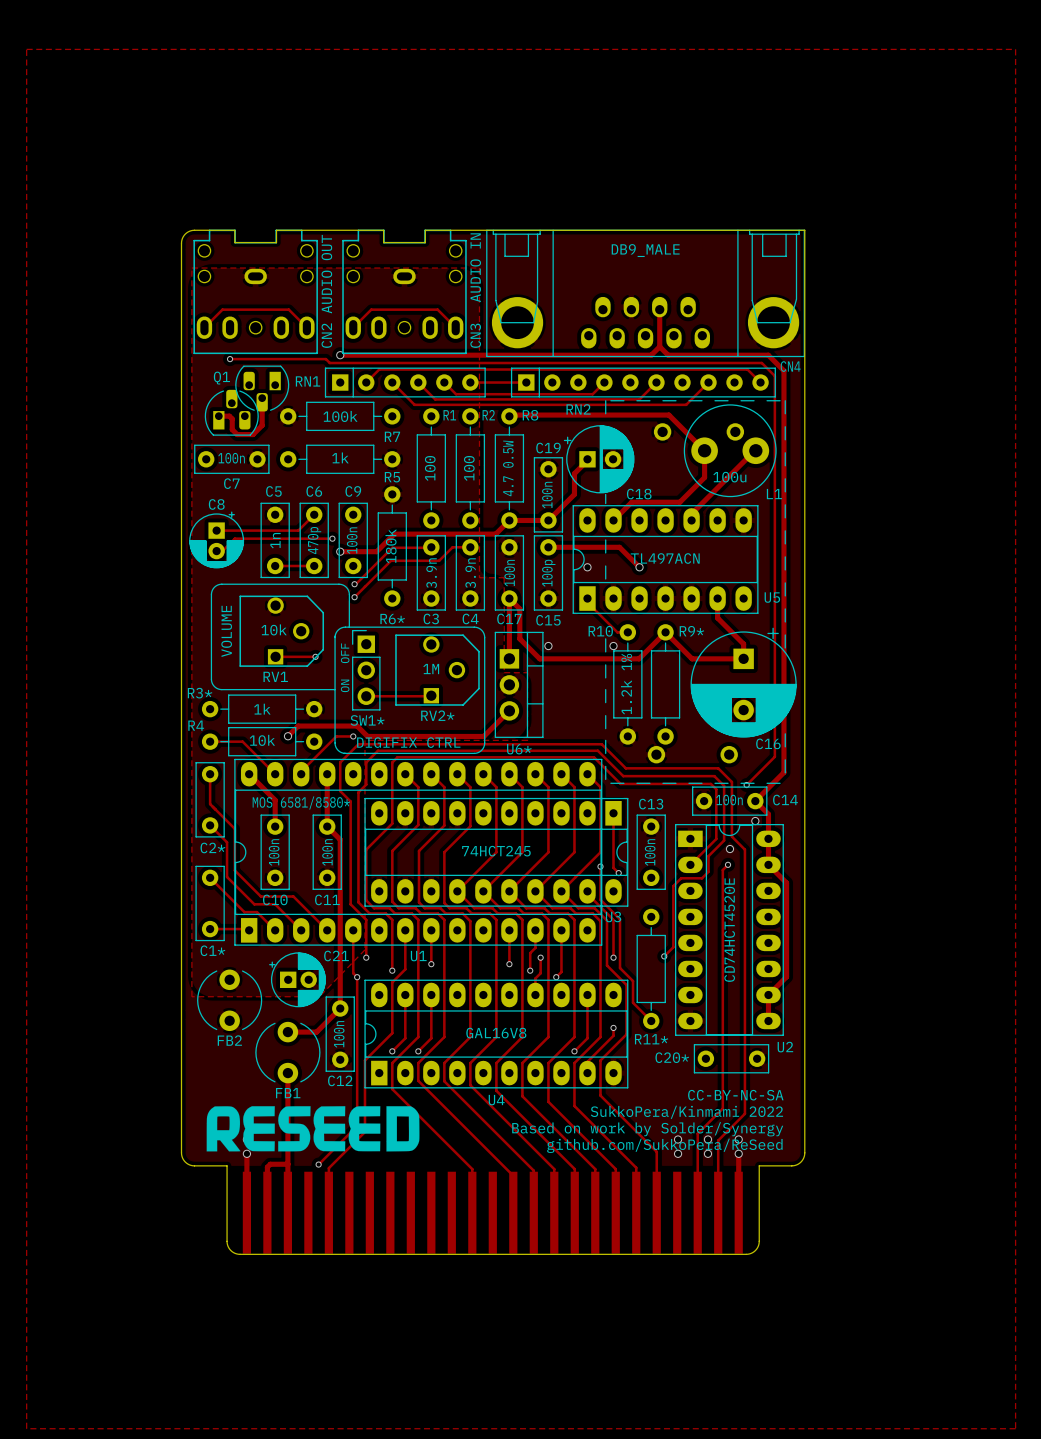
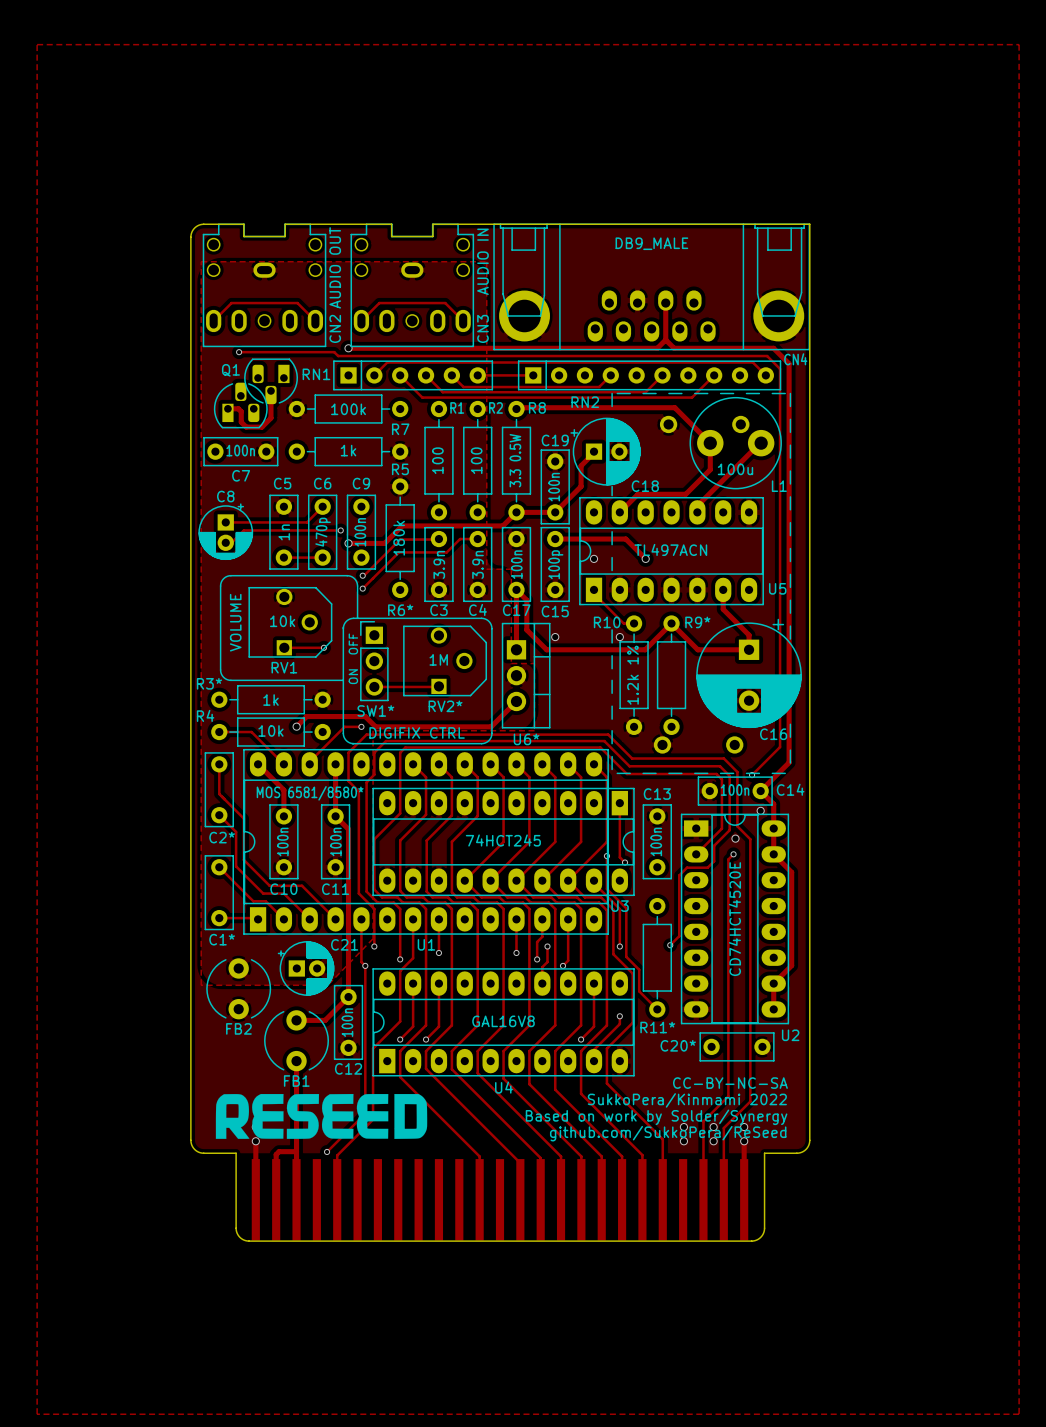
text: 4.7 0.5W (508, 468) -> 3.3 0.5W (515, 460)

